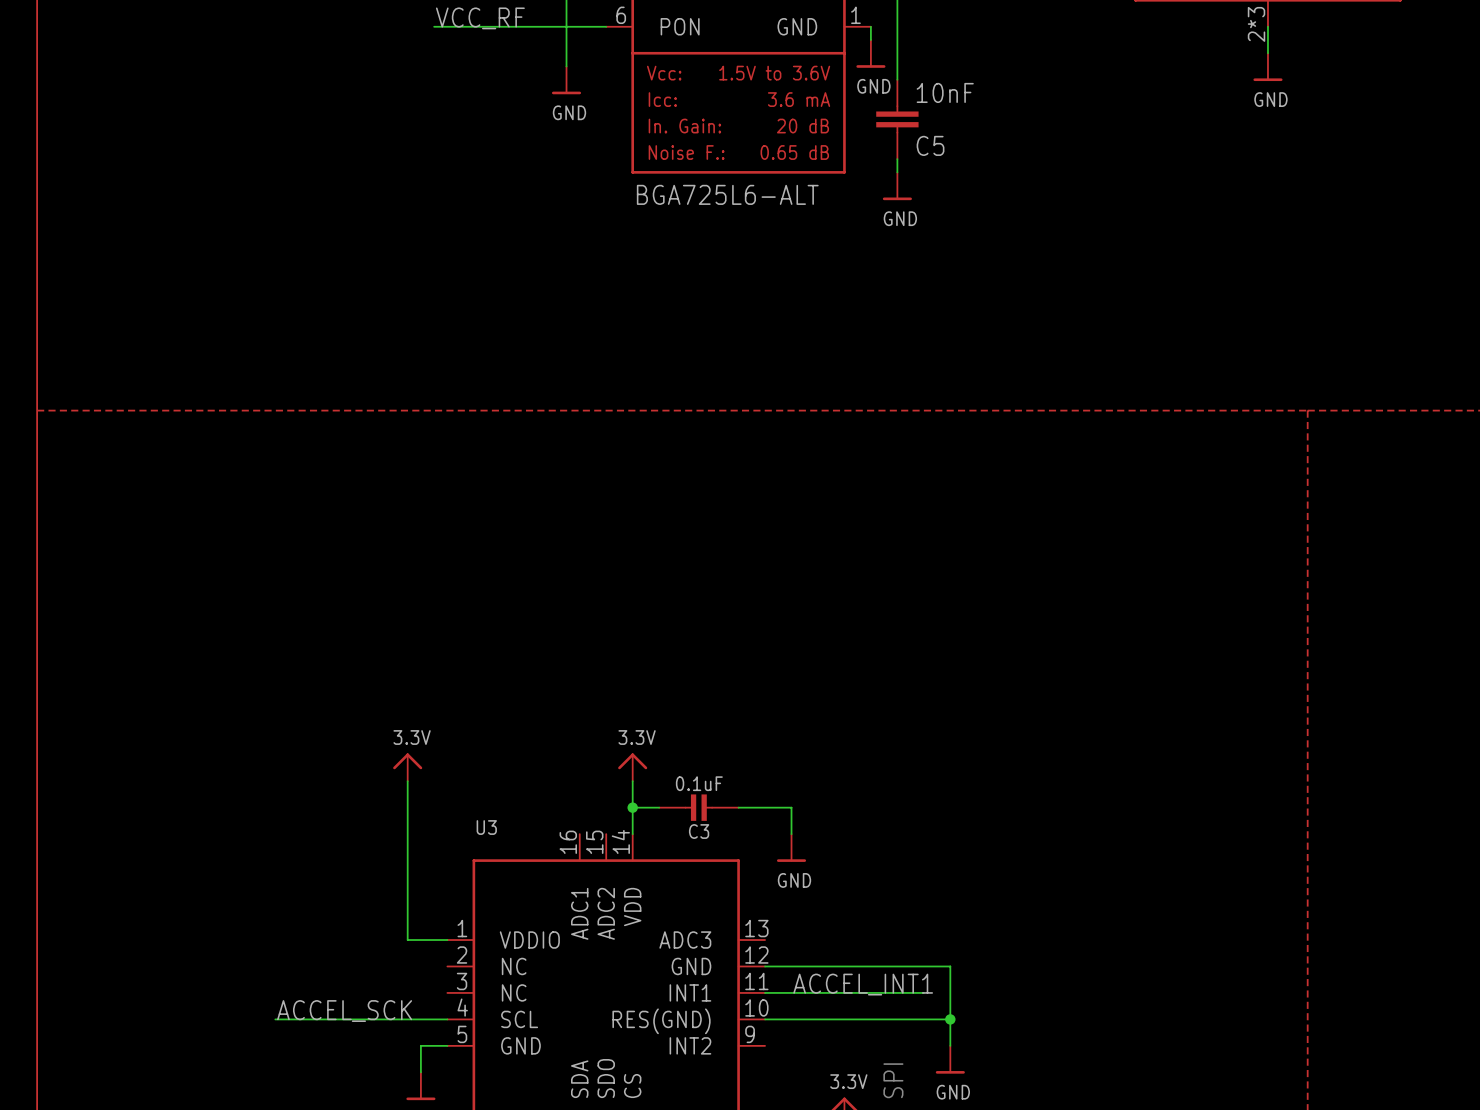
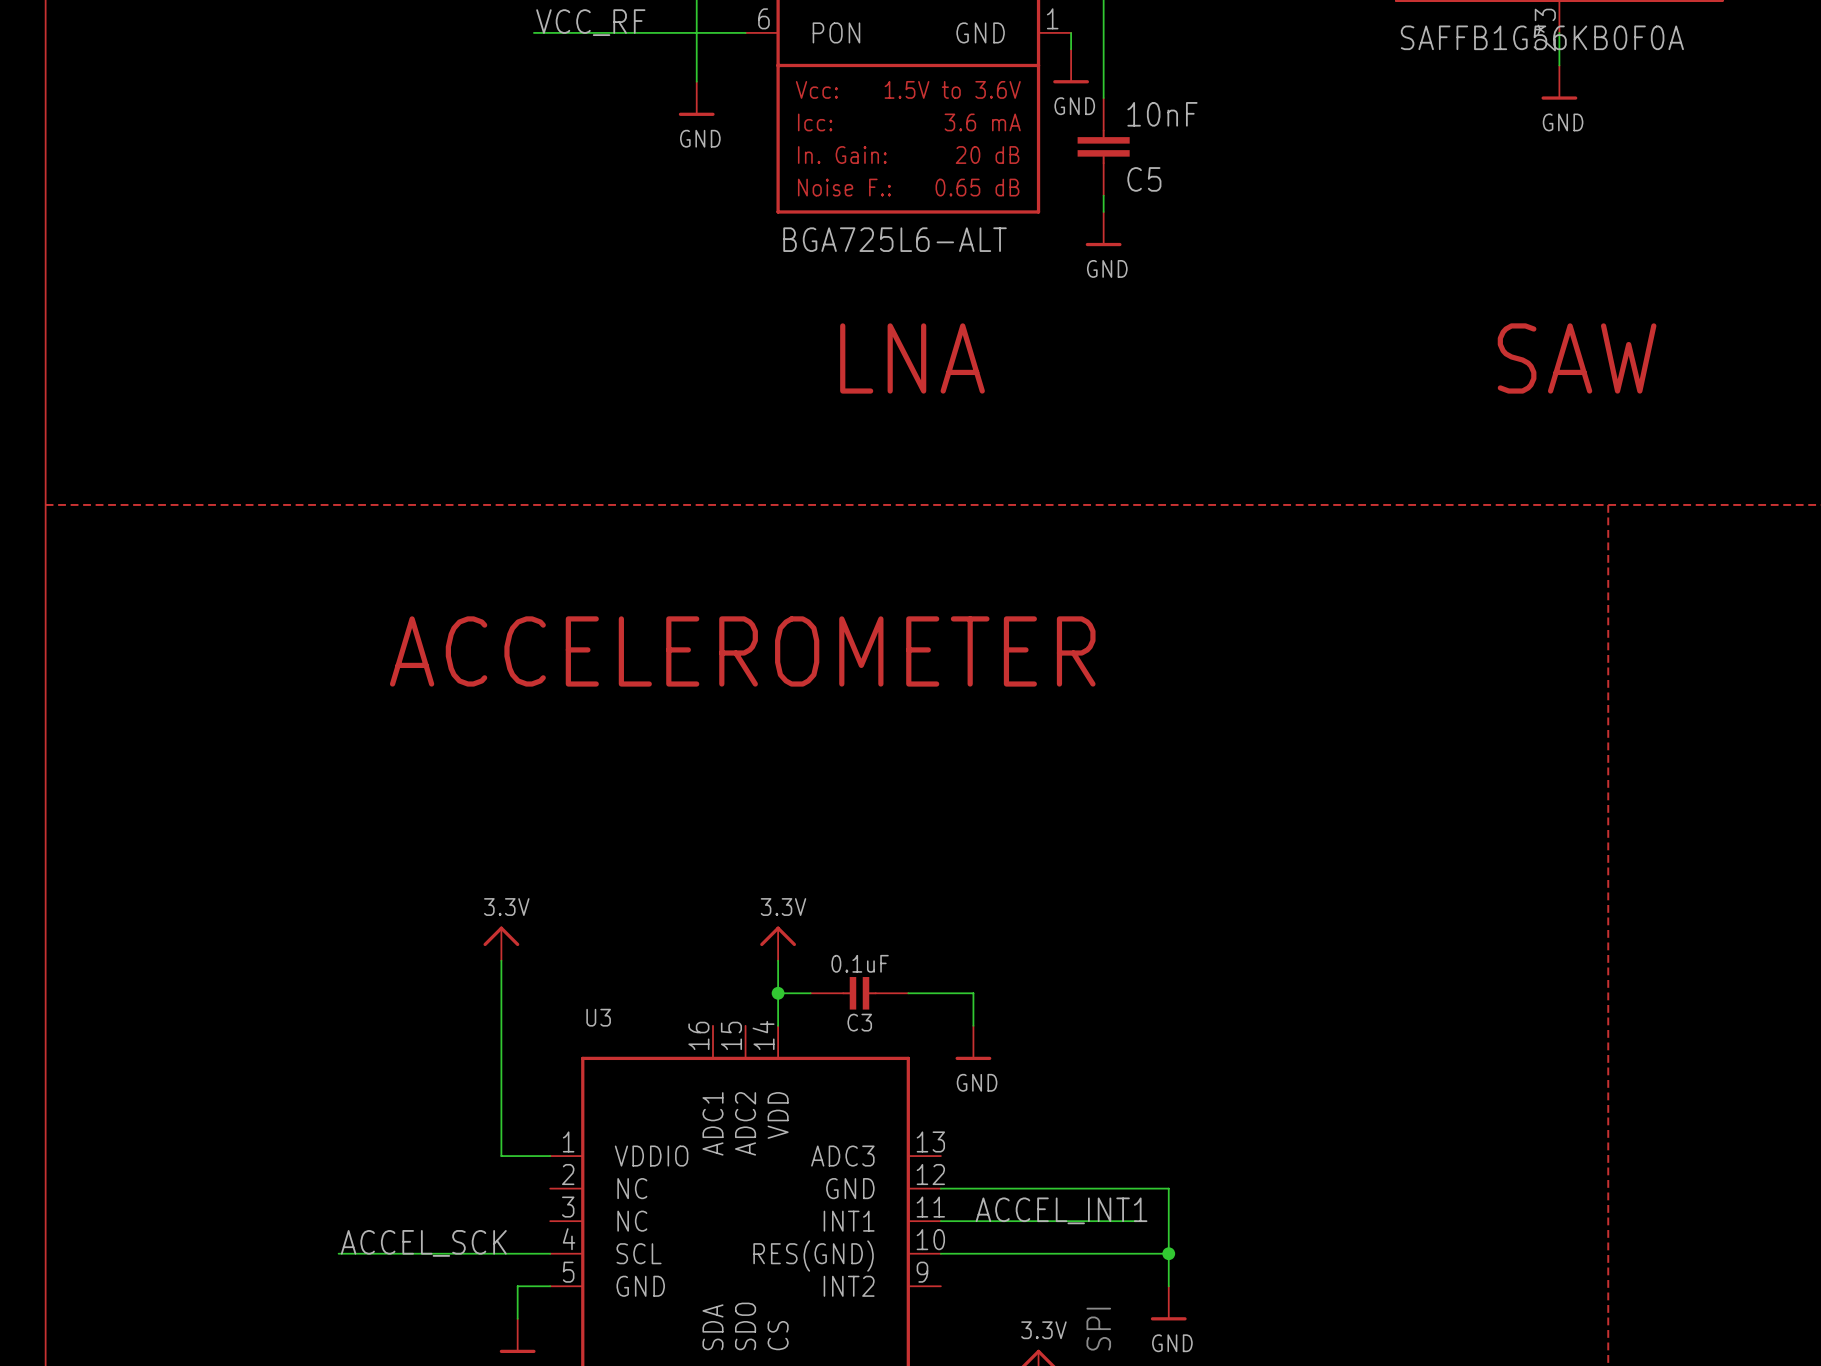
part value: none -> SAFFB1G56KB0F0A (1542, 37)
text: none -> LNA (912, 358)
text: none -> SAW (1577, 358)
text: none -> ACCELEROMETER (742, 651)

